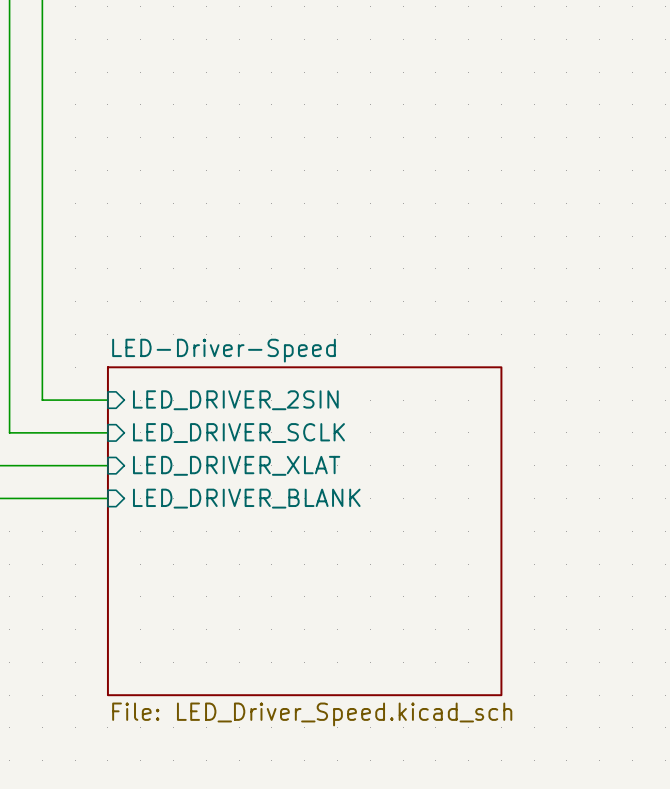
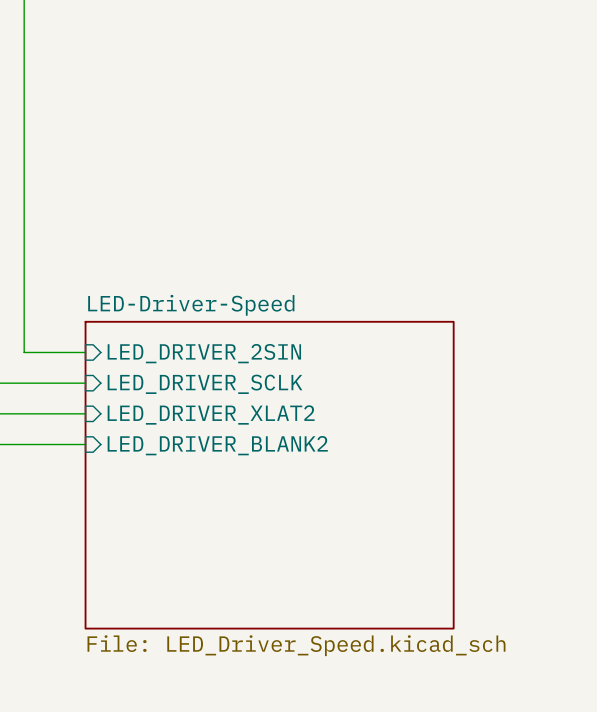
sheet pin: LED_DRIVER_XLAT (236, 465) -> LED_DRIVER_XLAT2 (211, 414)
sheet pin: LED_DRIVER_BLANK (246, 498) -> LED_DRIVER_BLANK2 (217, 445)

